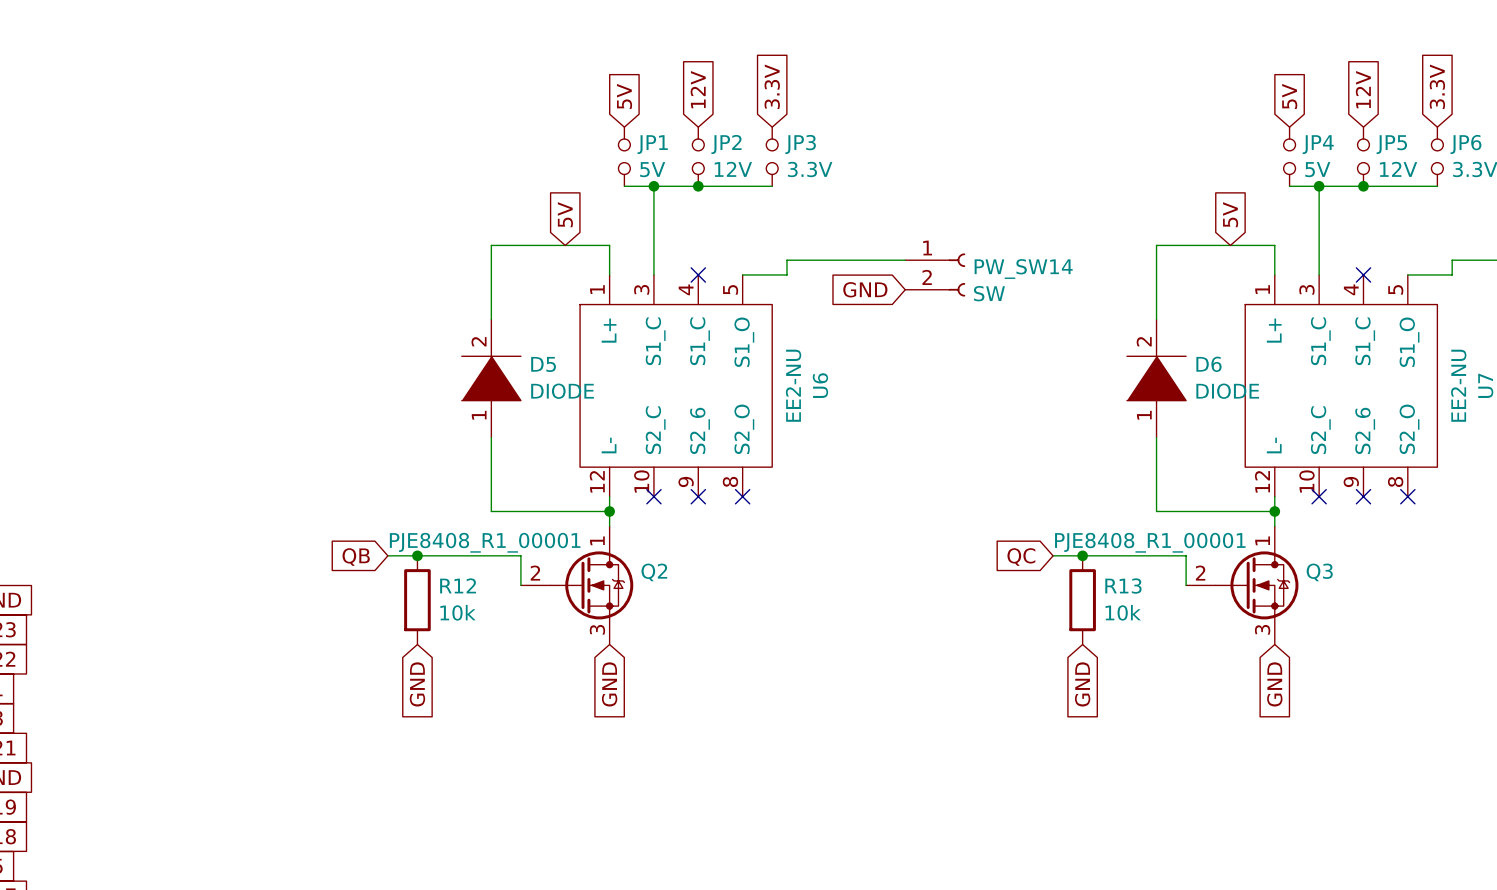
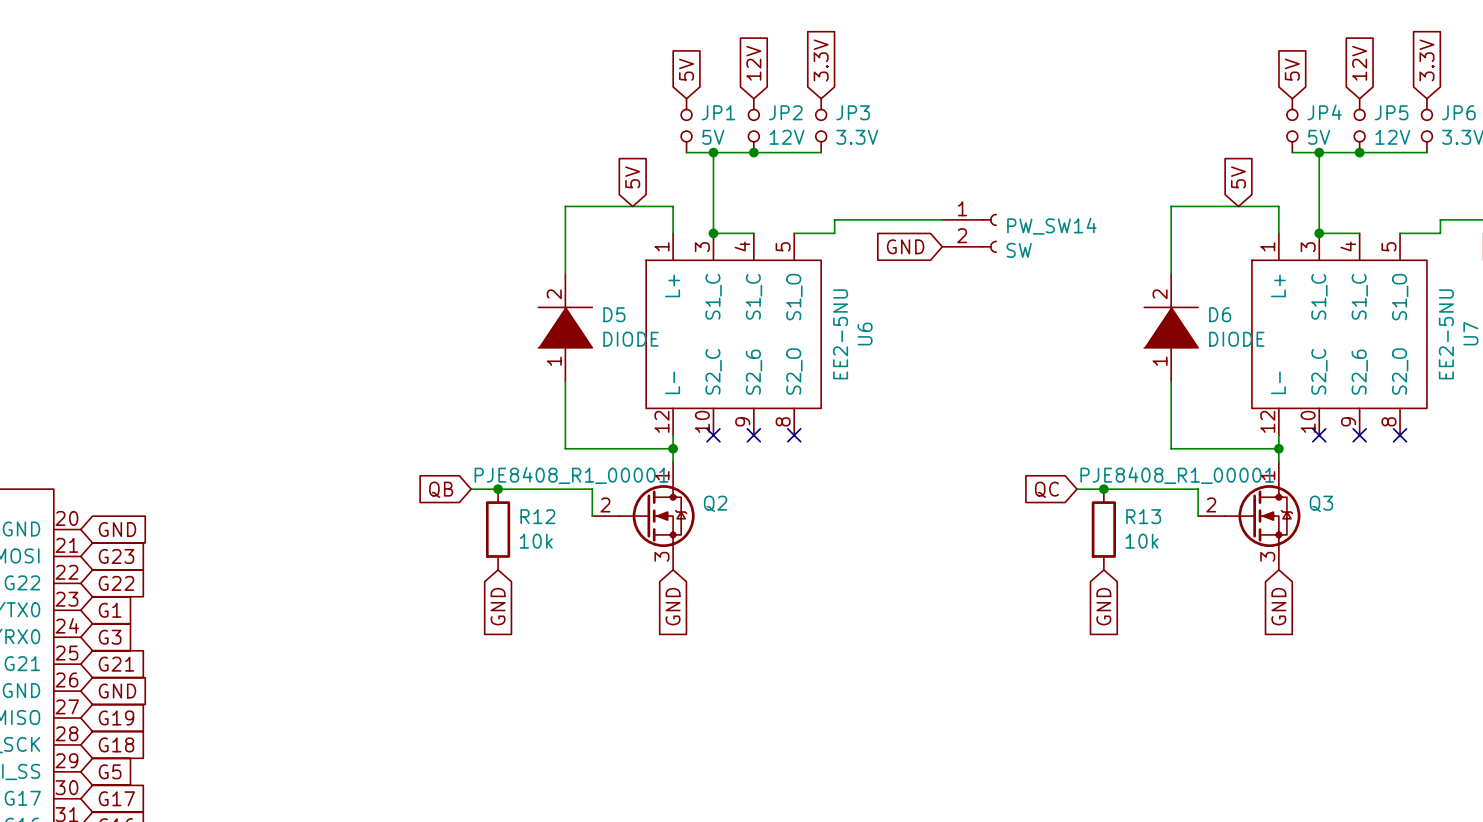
wire: none -> (713, 233) (753, 233)
junction: none -> (713, 233)
no-connect mark: (698, 274) -> none
wire: none -> (1319, 233) (1359, 233)
junction: none -> (1319, 233)
no-connect mark: (1363, 274) -> none
U6 value: EE2-NU (793, 385) -> EE2-5NU (840, 334)
U7 value: EE2-NU (1458, 385) -> EE2-5NU (1446, 334)

